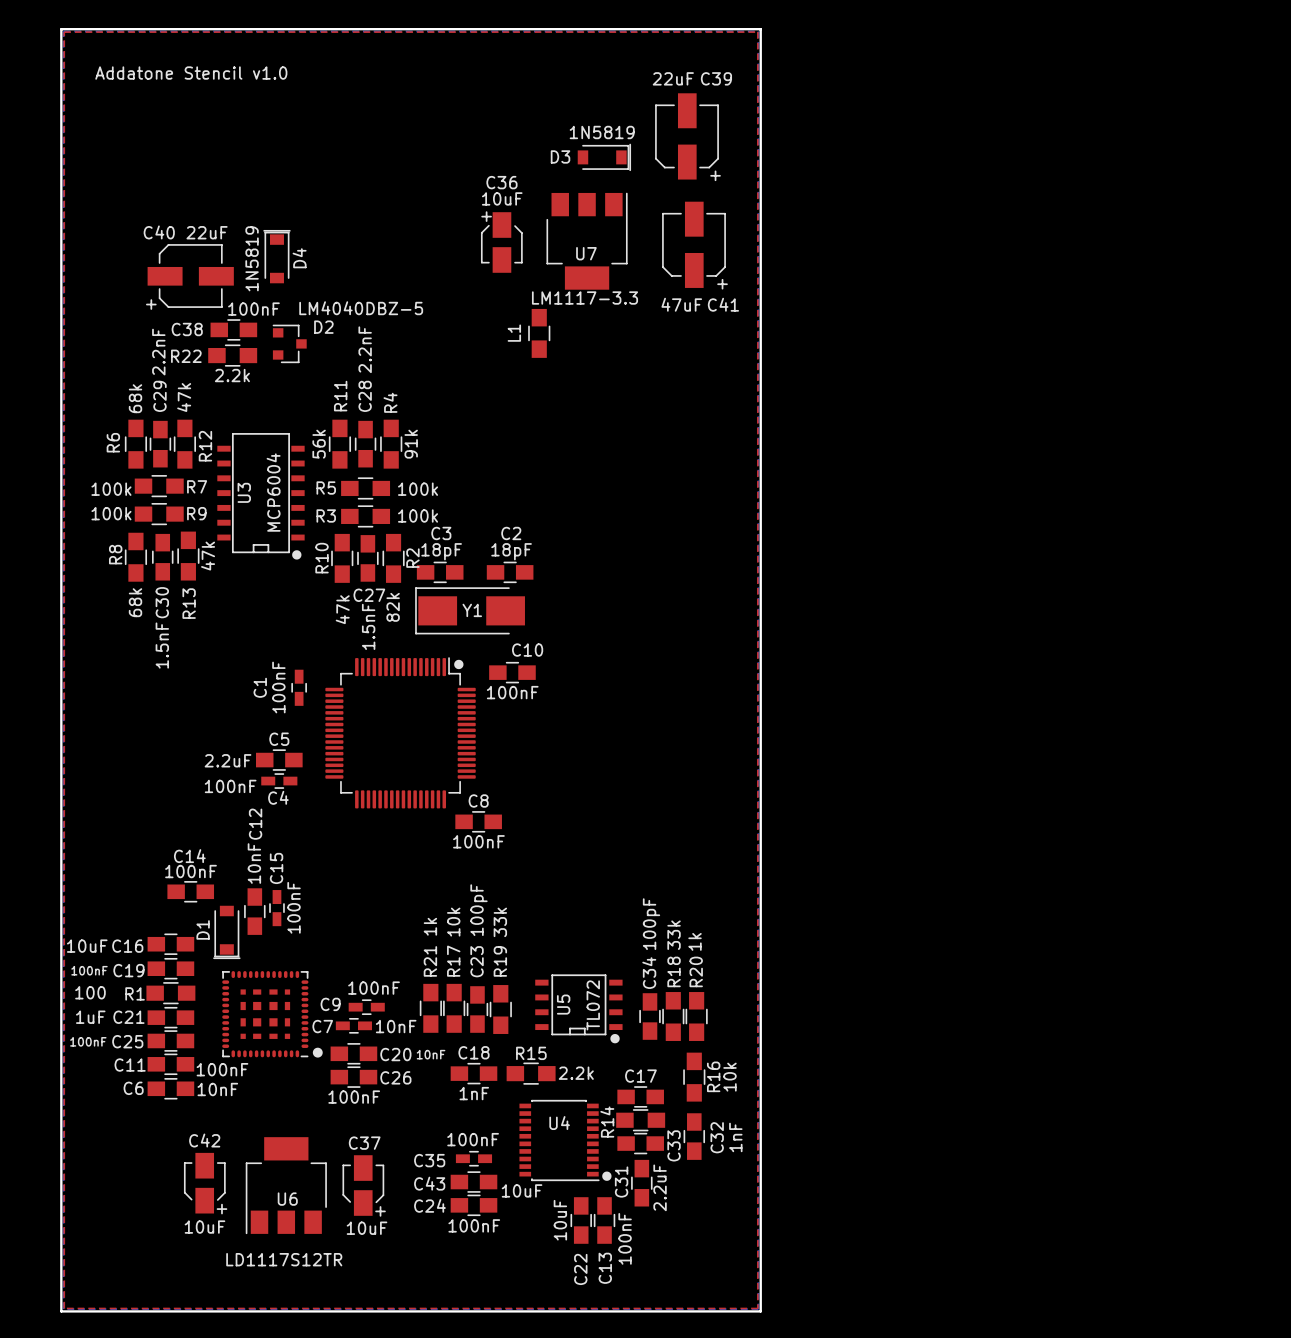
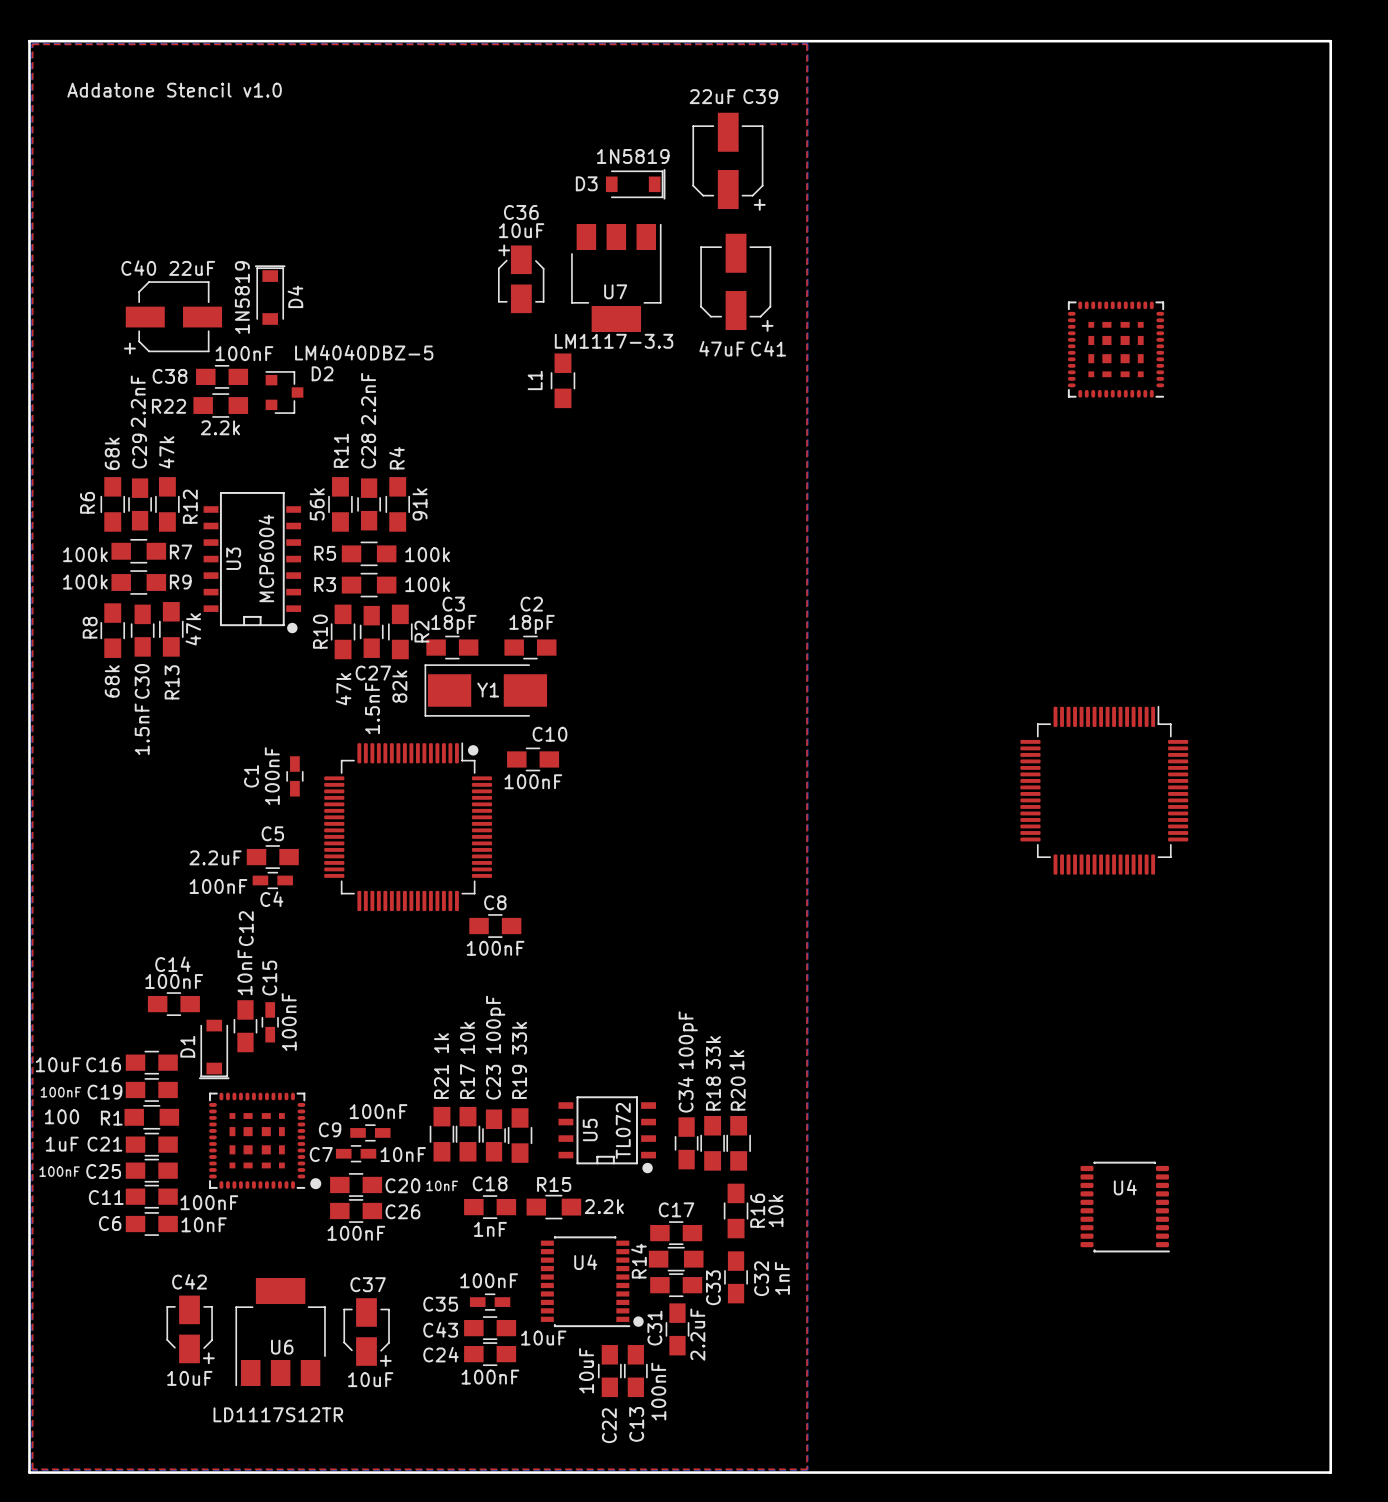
board edge: (760, 29) (760, 1311) -> (810, 41) (1330, 41) (1330, 1472) (810, 1472)
part: none -> (1116, 349)
part: none -> (1104, 790)
U4: none -> (1125, 1207)

